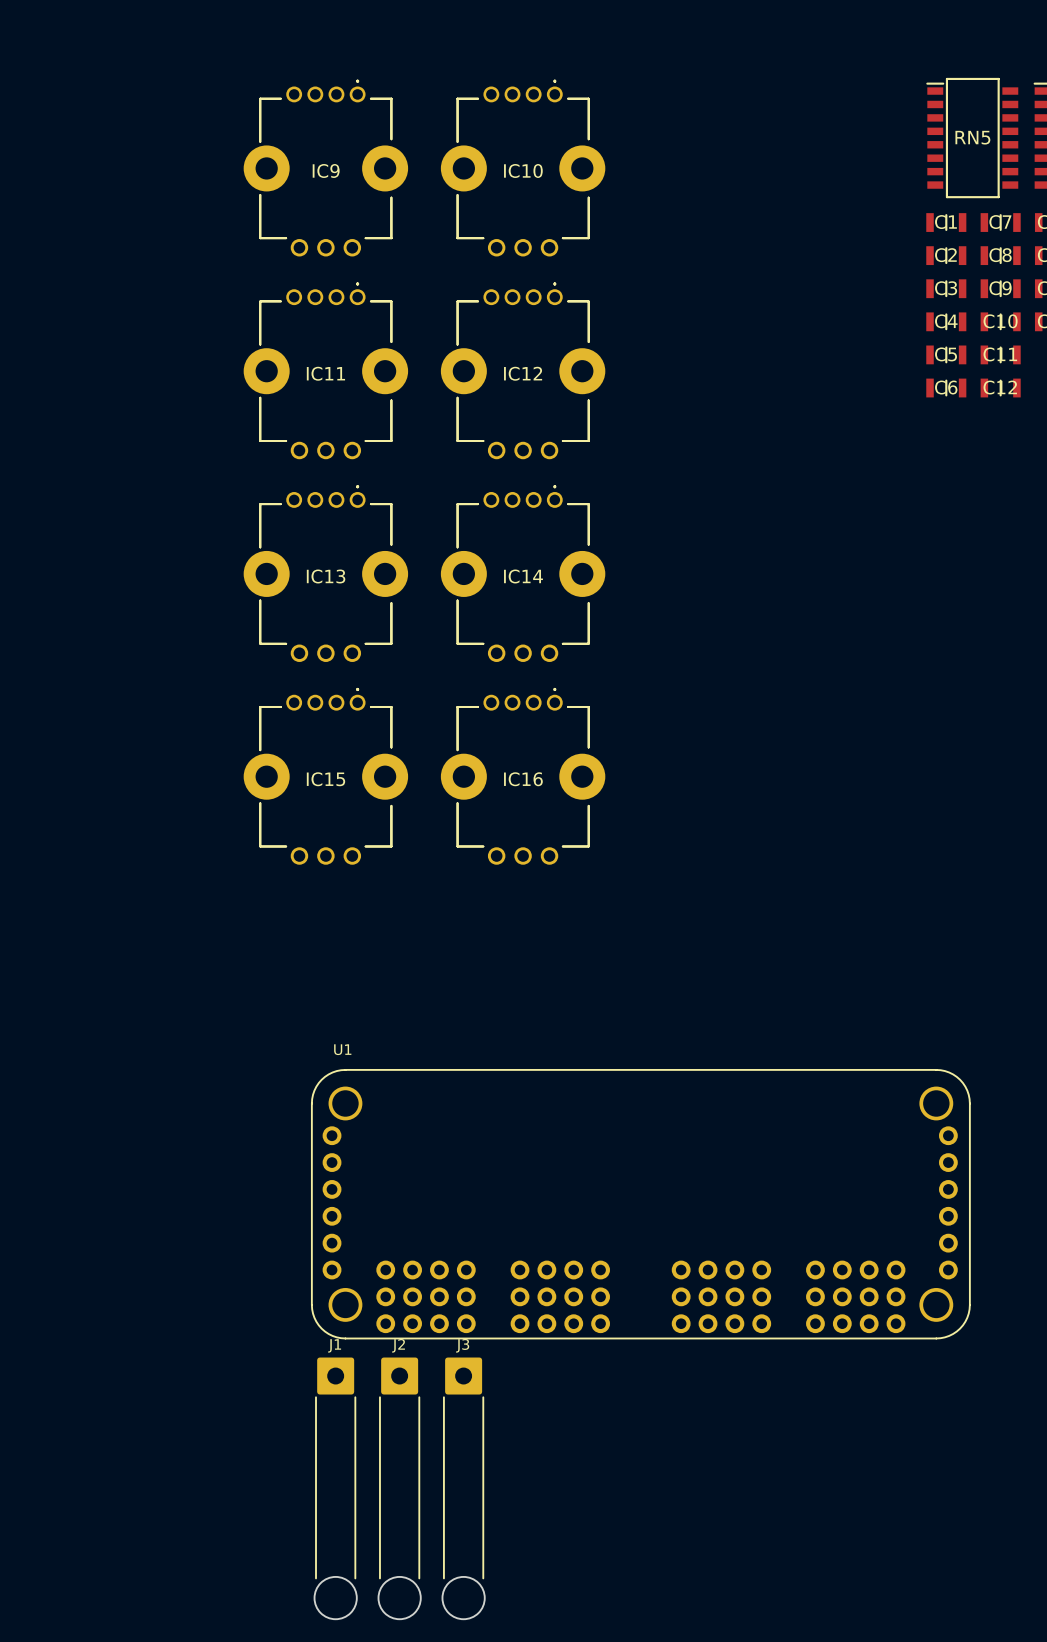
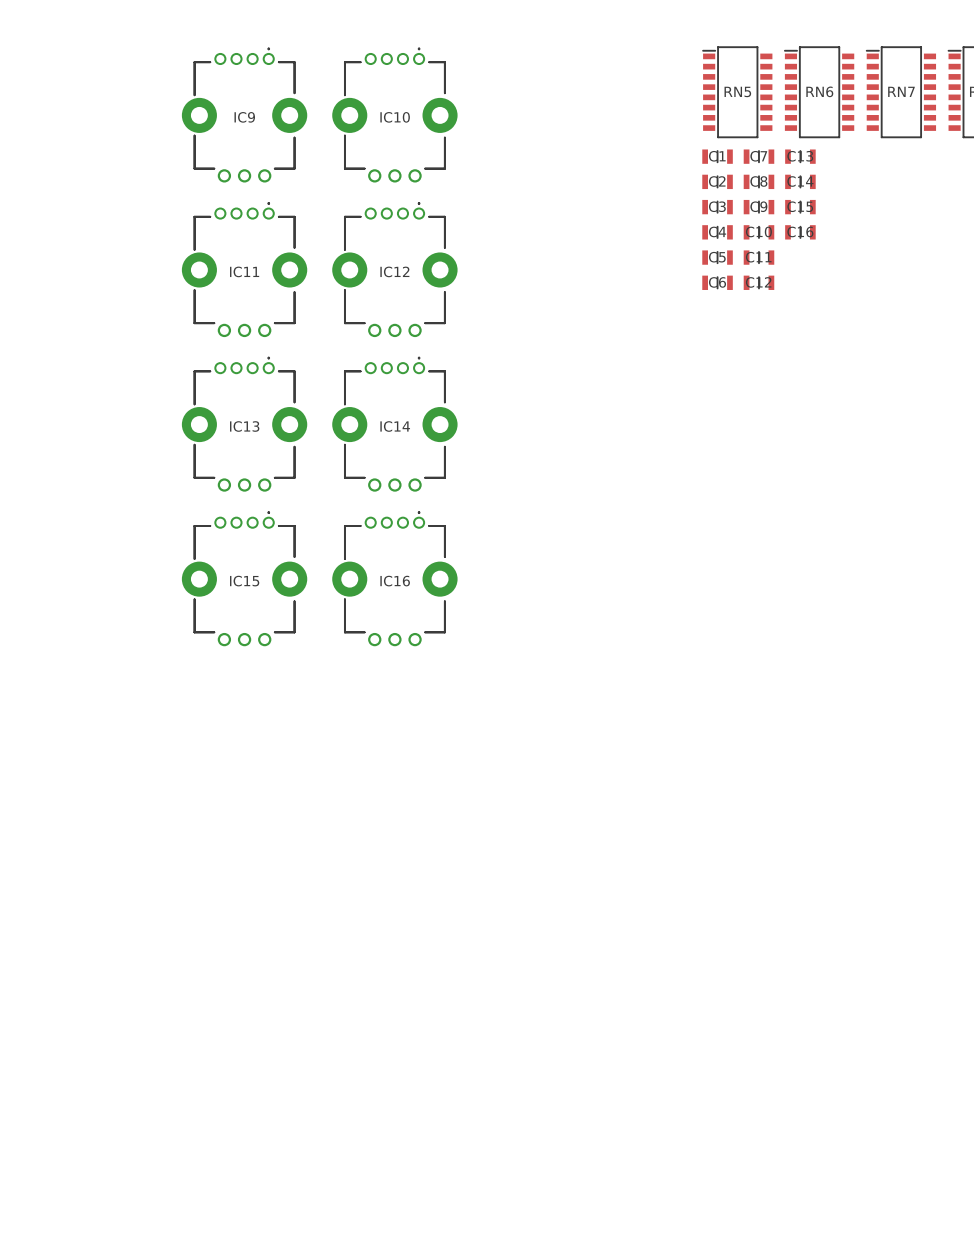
U1: (640, 1204) -> none
J1: (335, 1488) -> none
J2: (399, 1488) -> none
J3: (463, 1488) -> none

